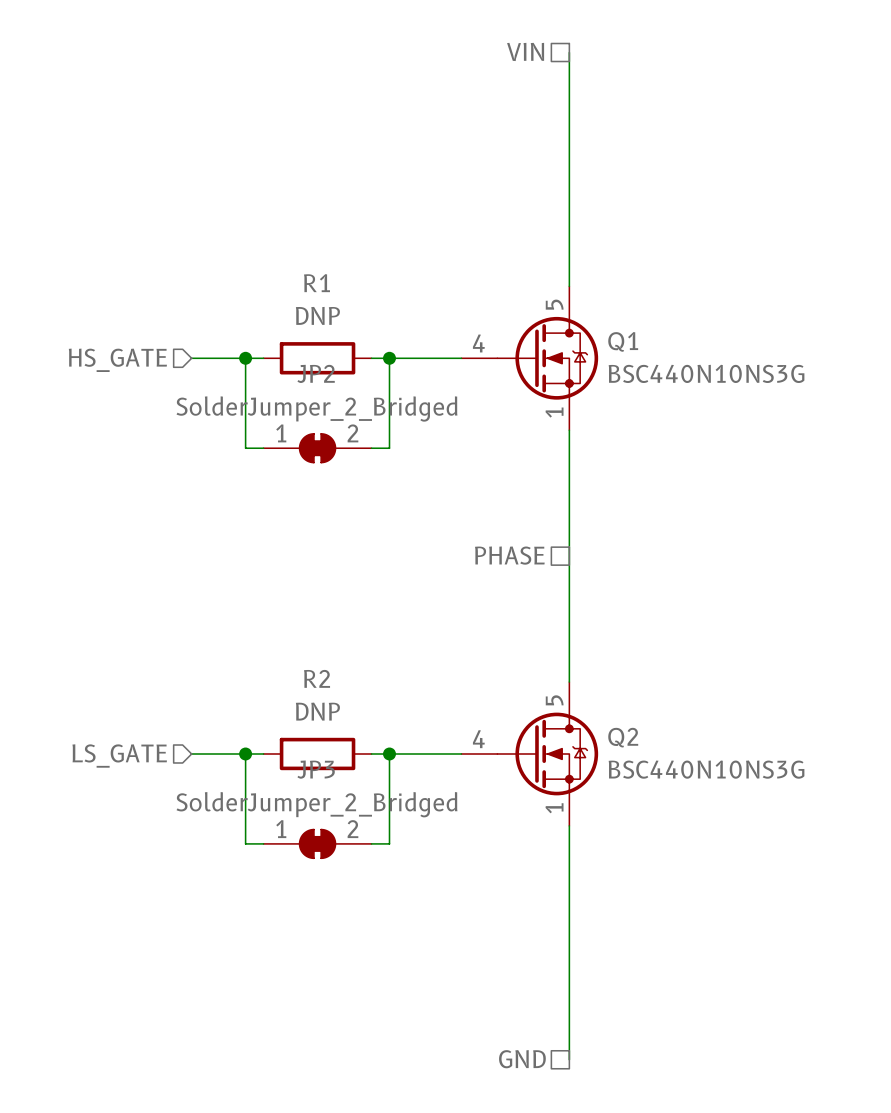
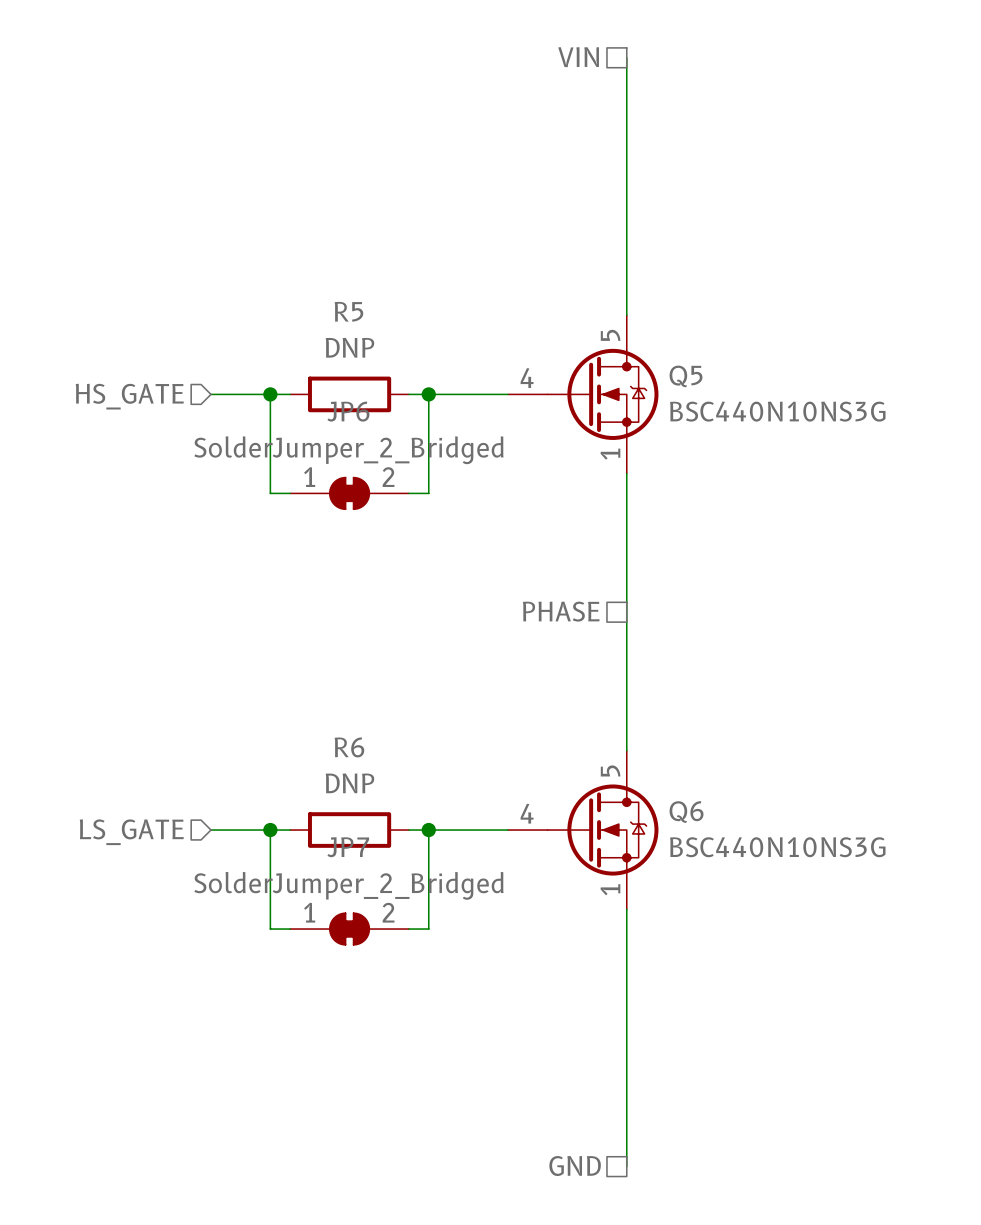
R1 name: R1 (316, 283) -> R5 (348, 311)
Q1 name: Q1 (623, 341) -> Q5 (686, 376)
JP2 name: JP2 (316, 373) -> JP6 (348, 411)
R2 name: R2 (317, 678) -> R6 (349, 747)
Q2 name: Q2 (623, 737) -> Q6 (686, 812)
JP3 name: JP3 (316, 769) -> JP7 (348, 847)

